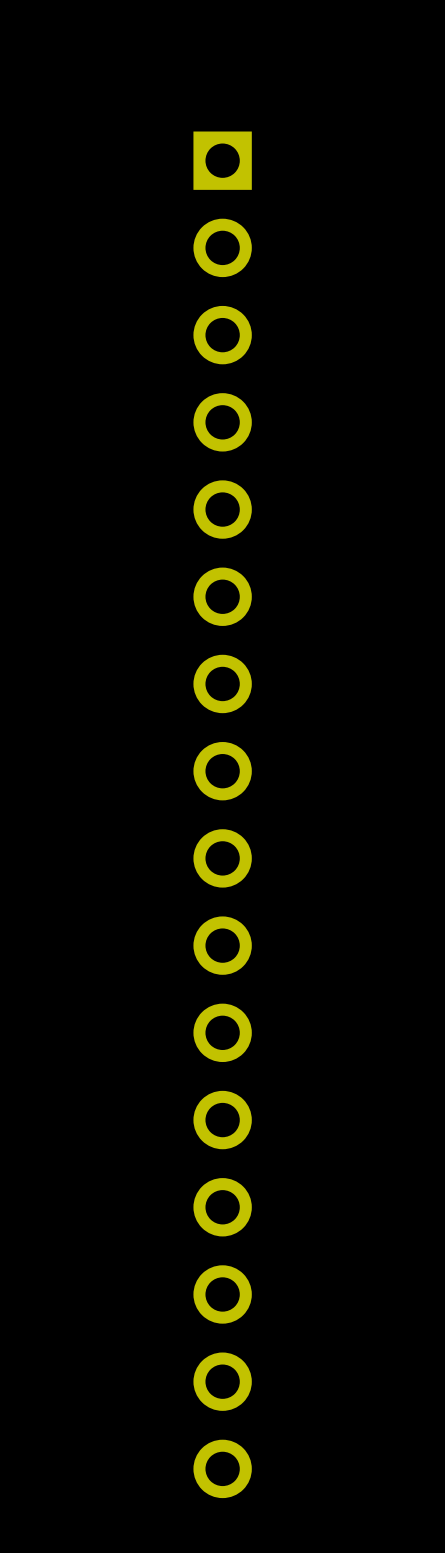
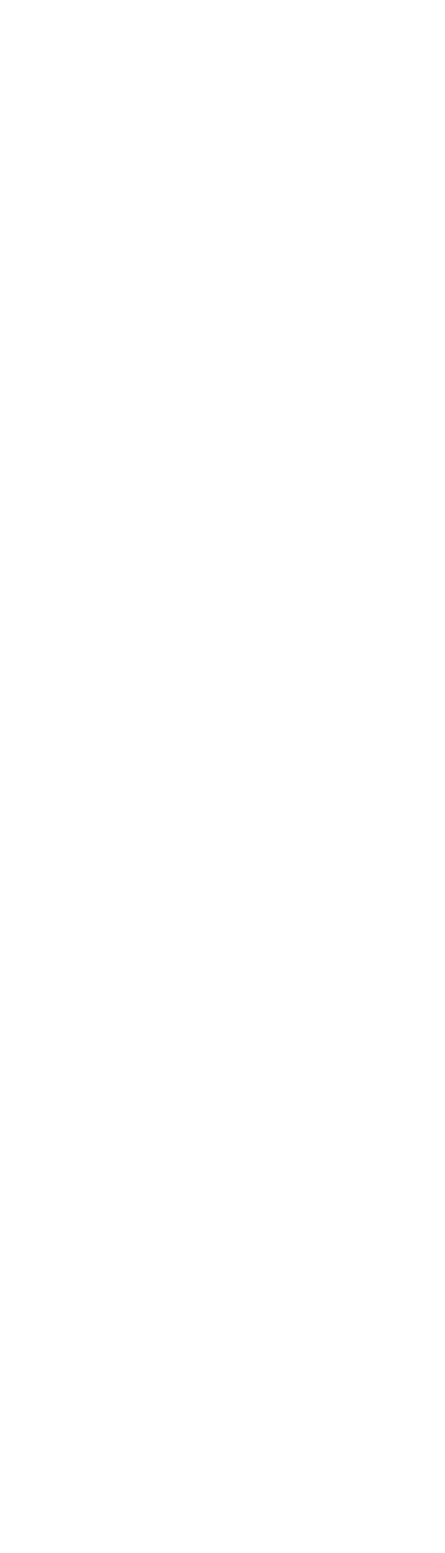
part: (222, 814) -> none

